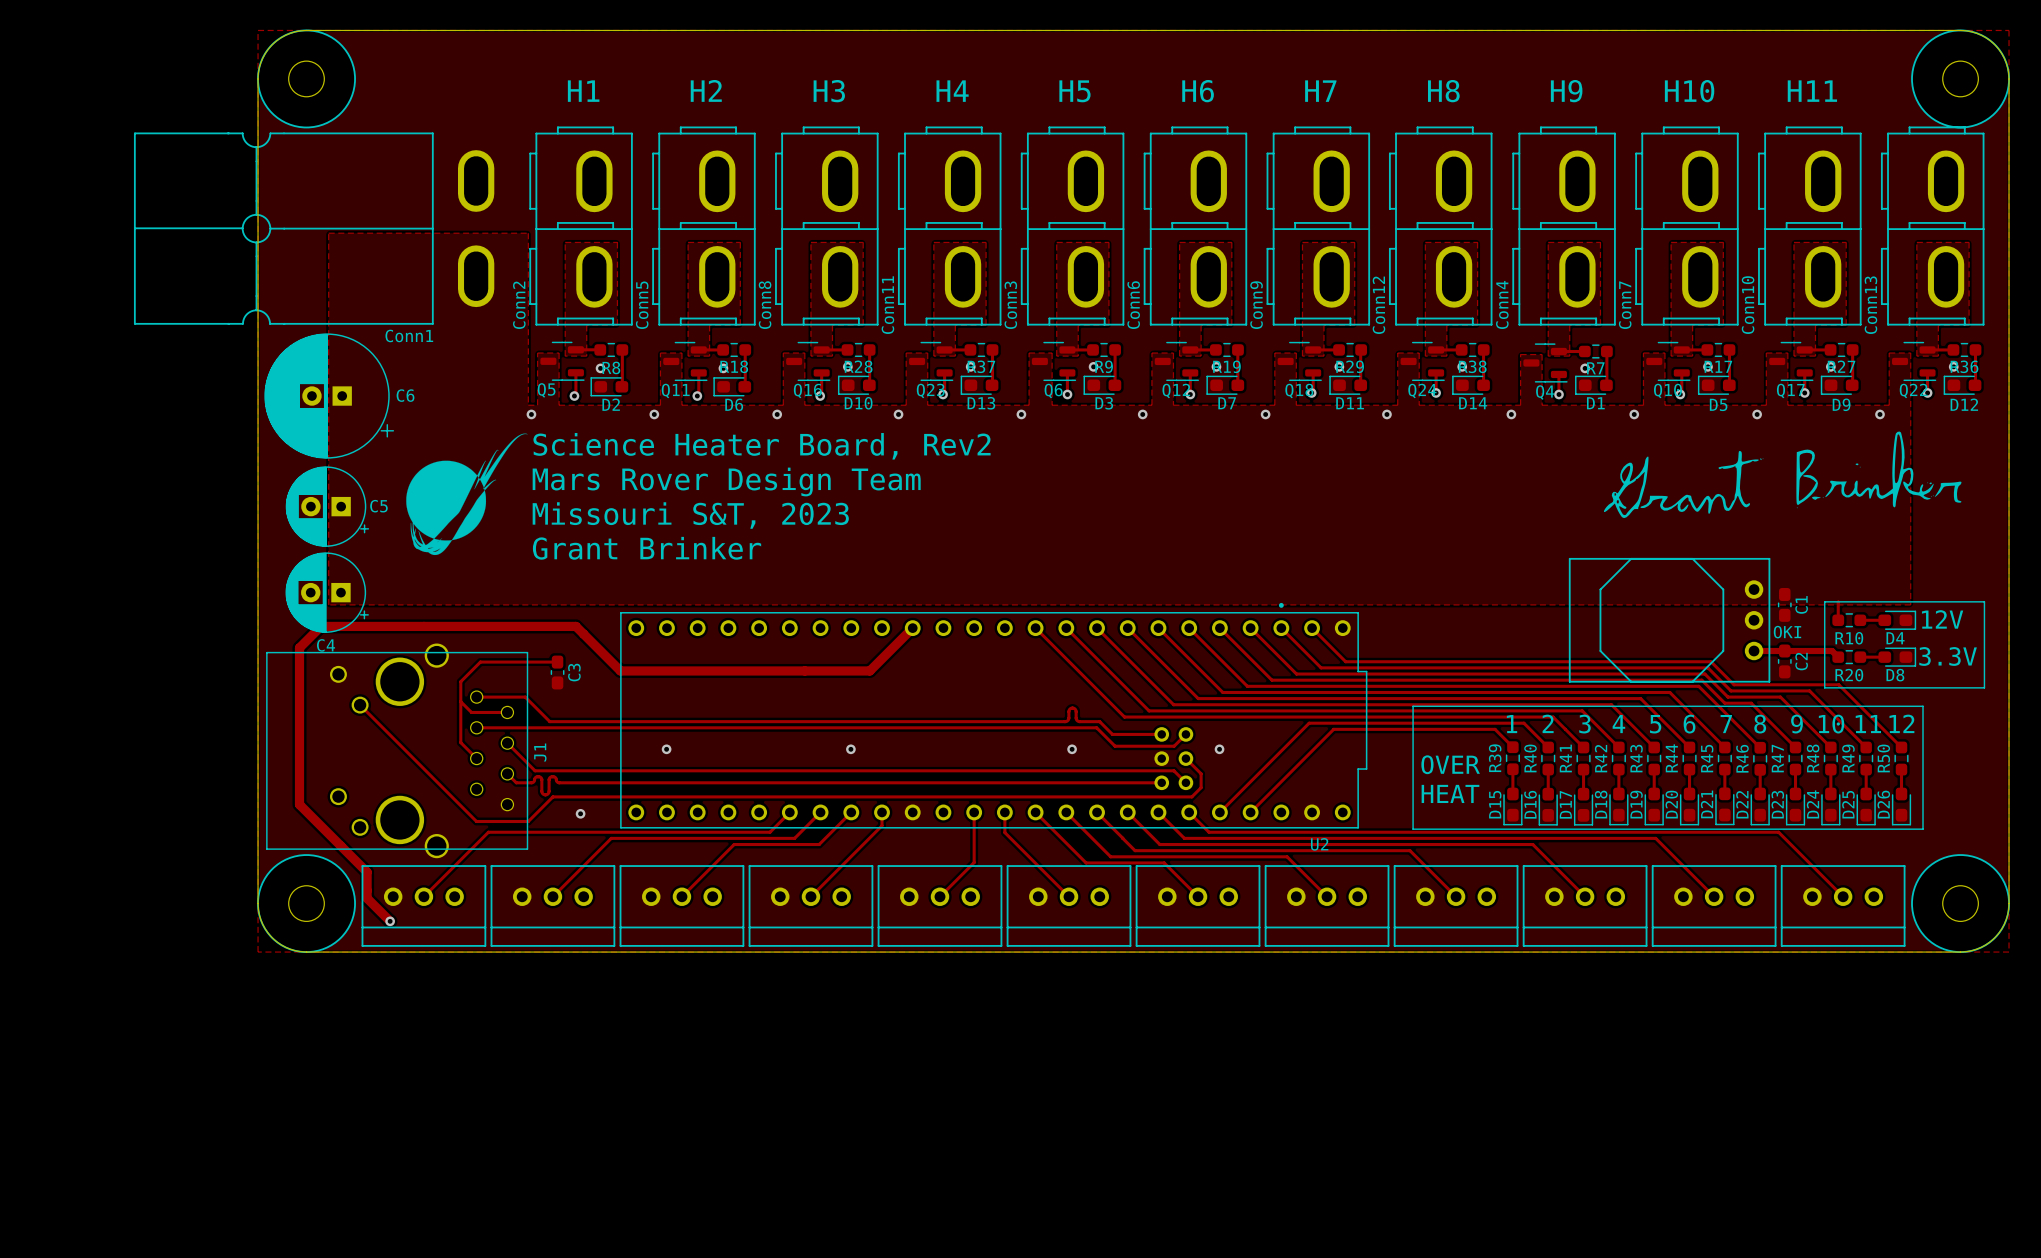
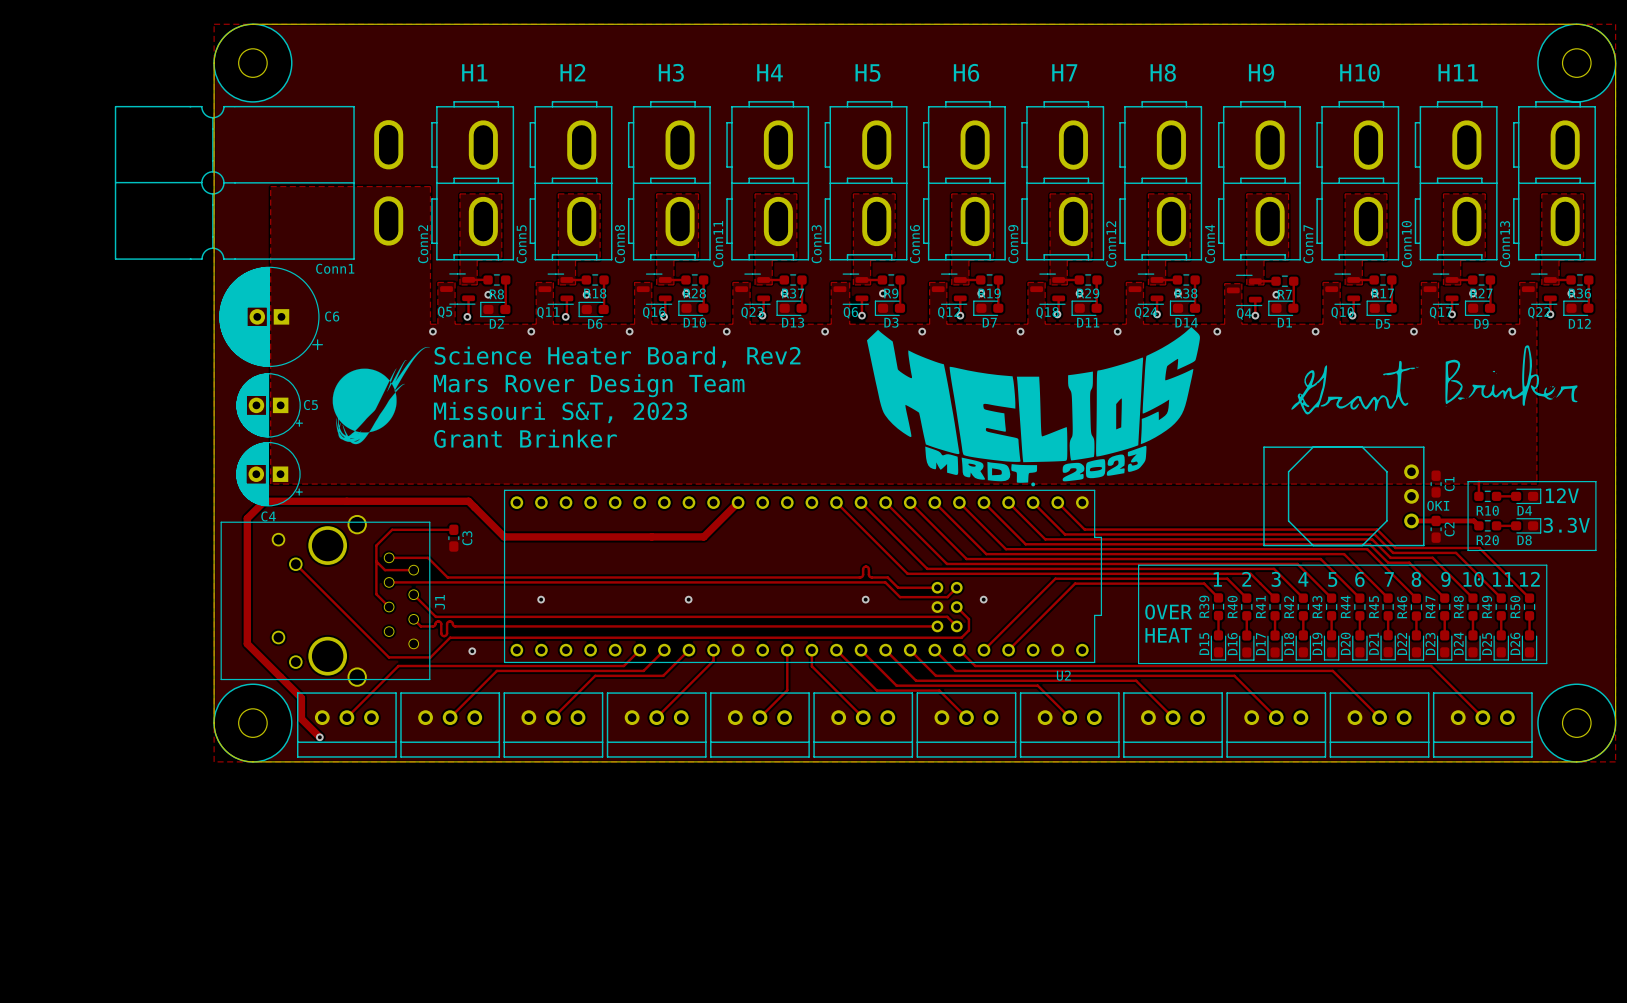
drawing: none -> [866, 327, 1200, 483]

